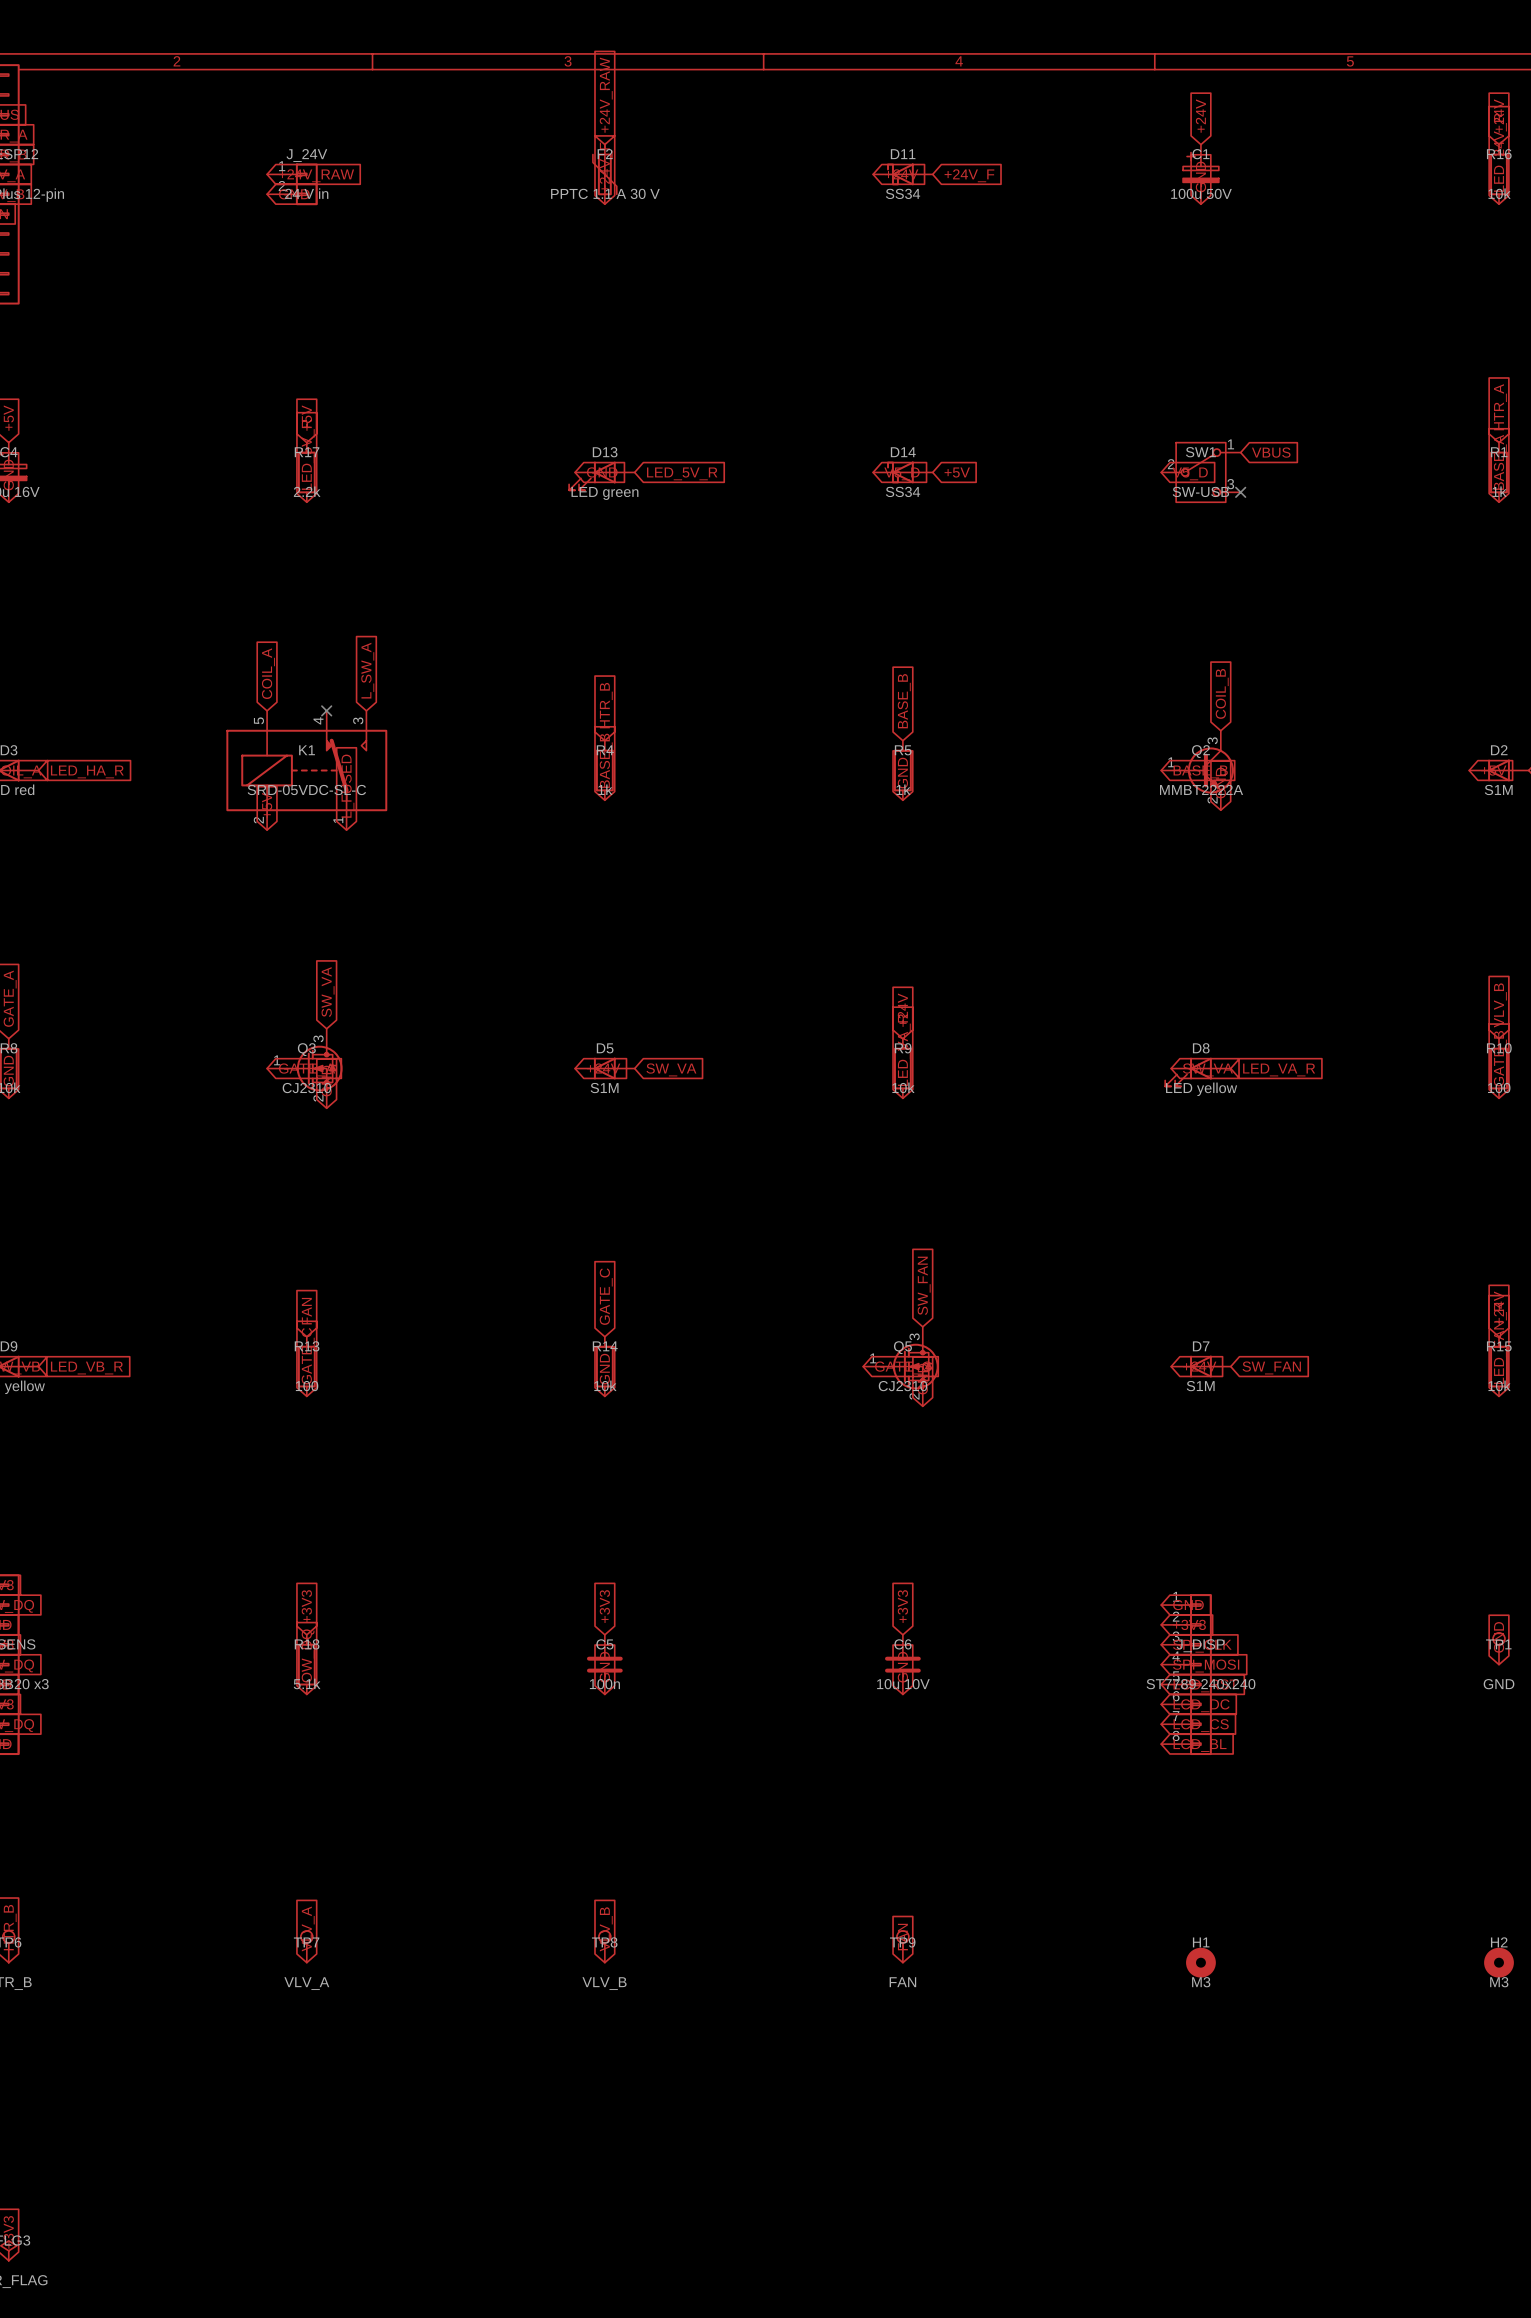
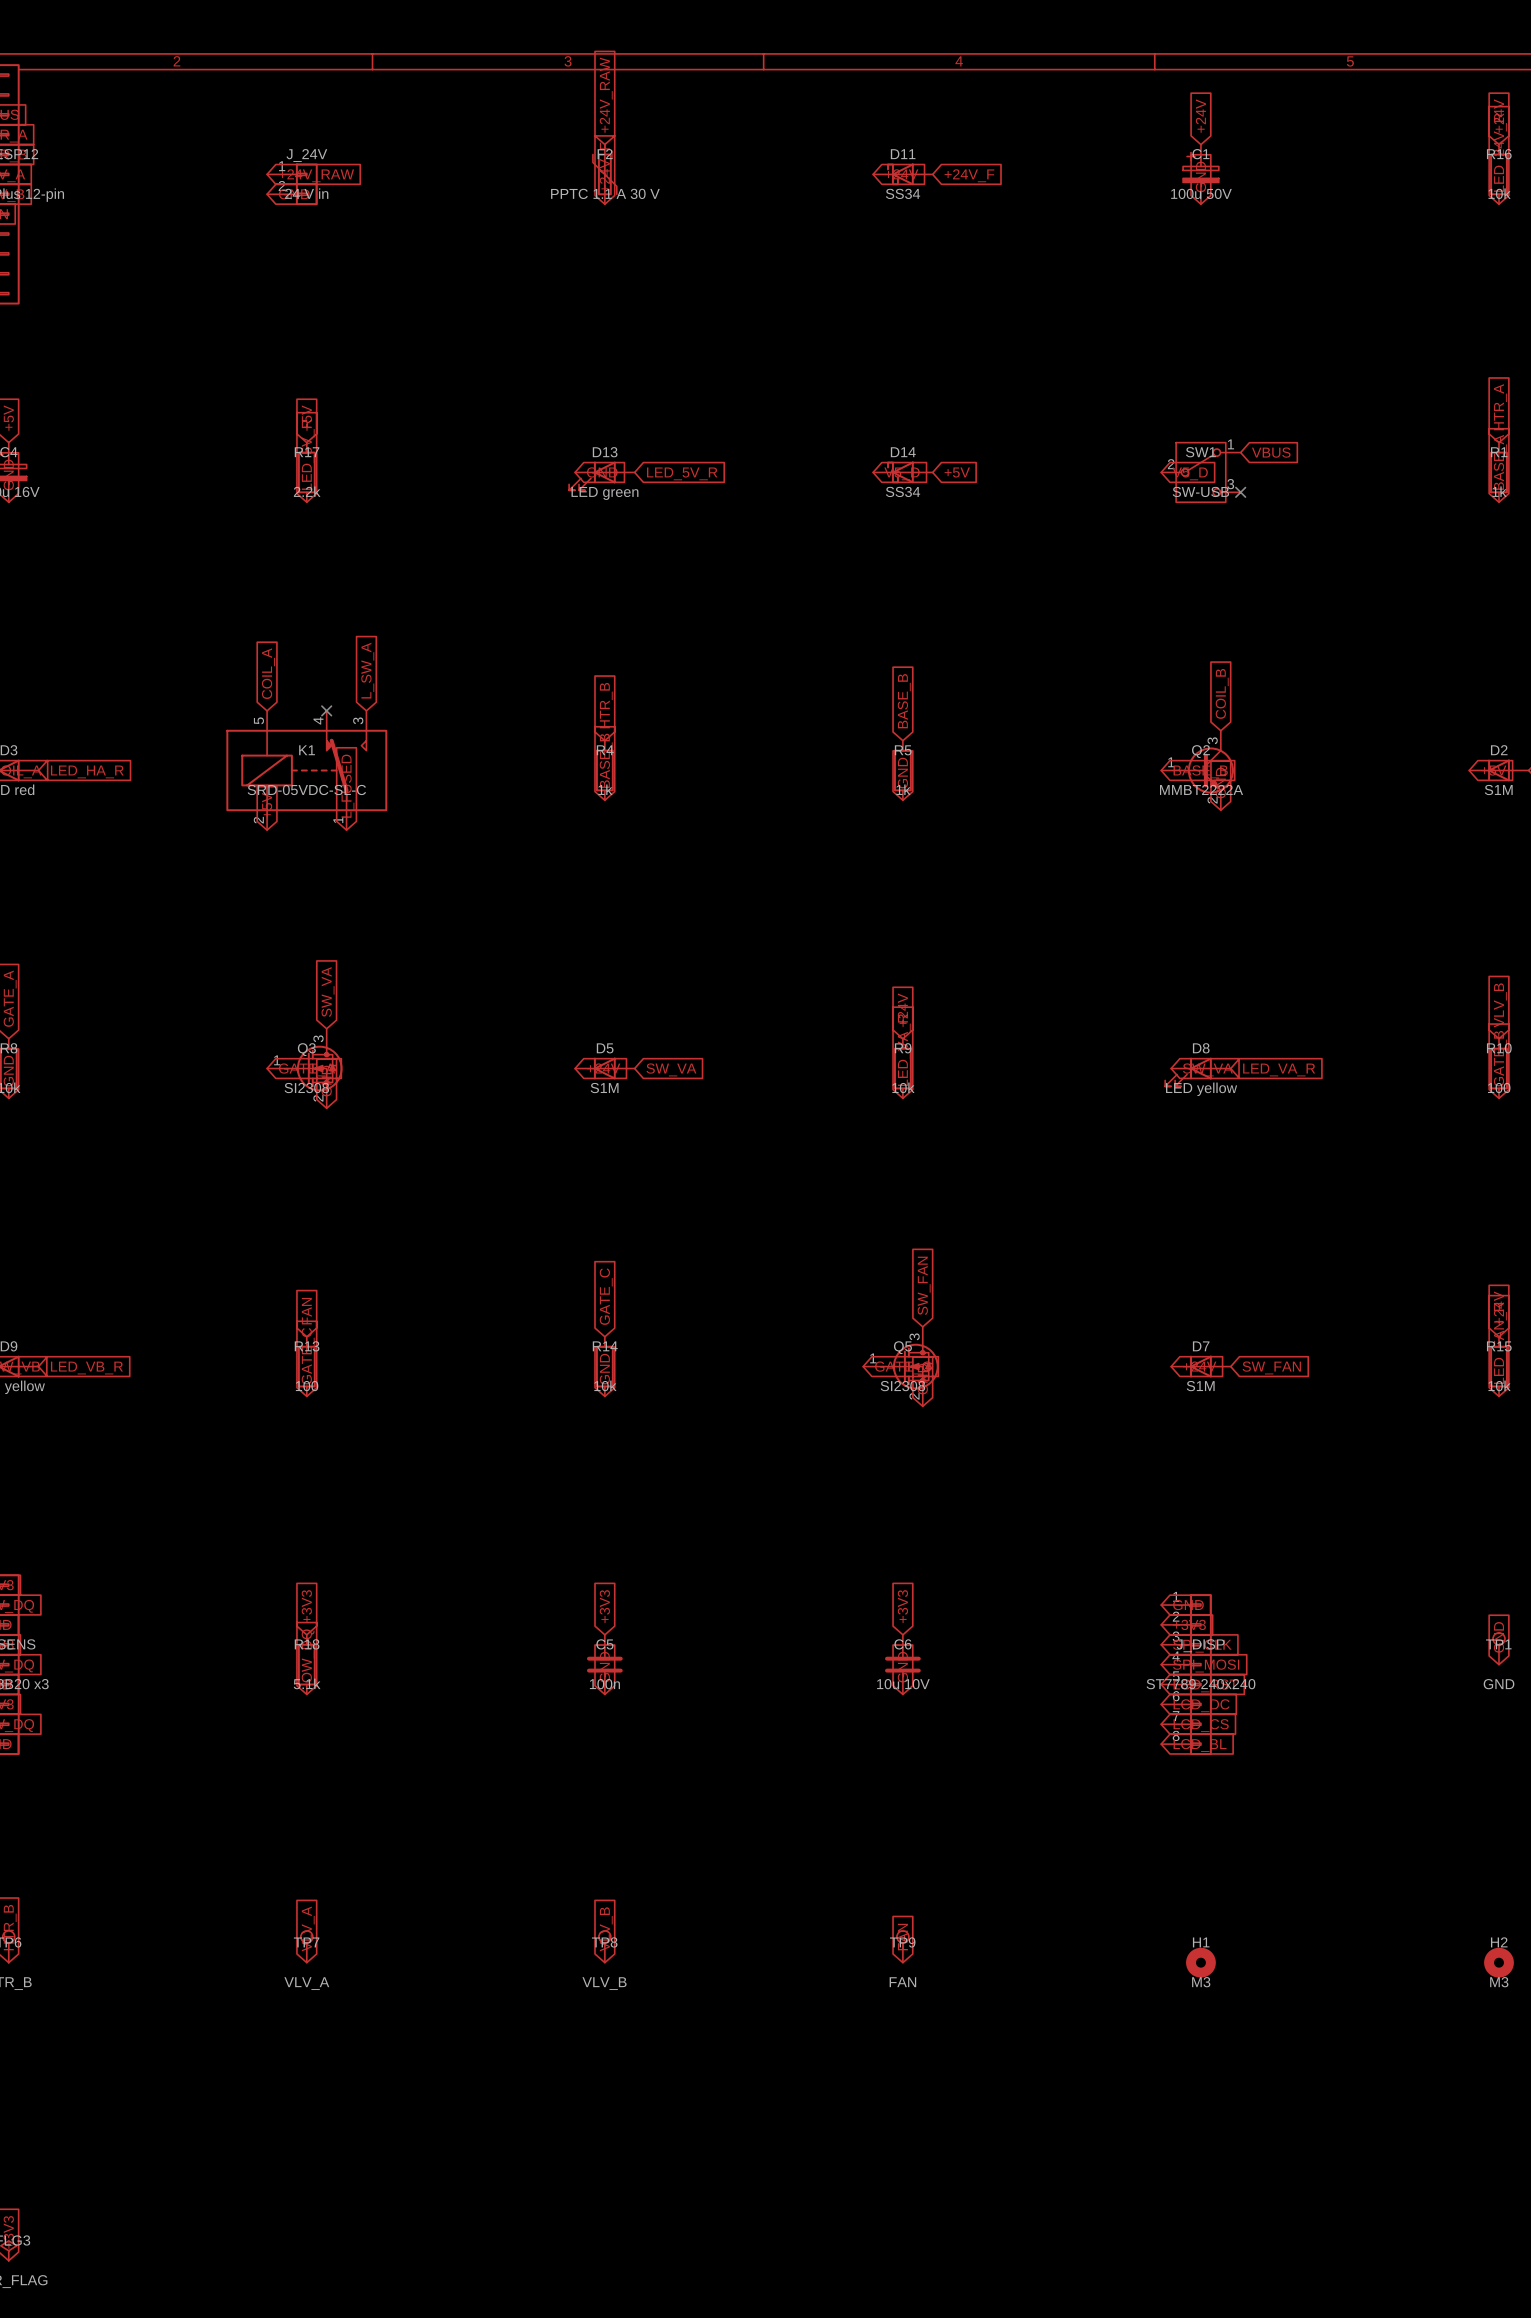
Q3 value: CJ2310 (306, 1088) -> SI2308 (306, 1088)
Q5 value: CJ2310 (902, 1386) -> SI2308 (902, 1386)

